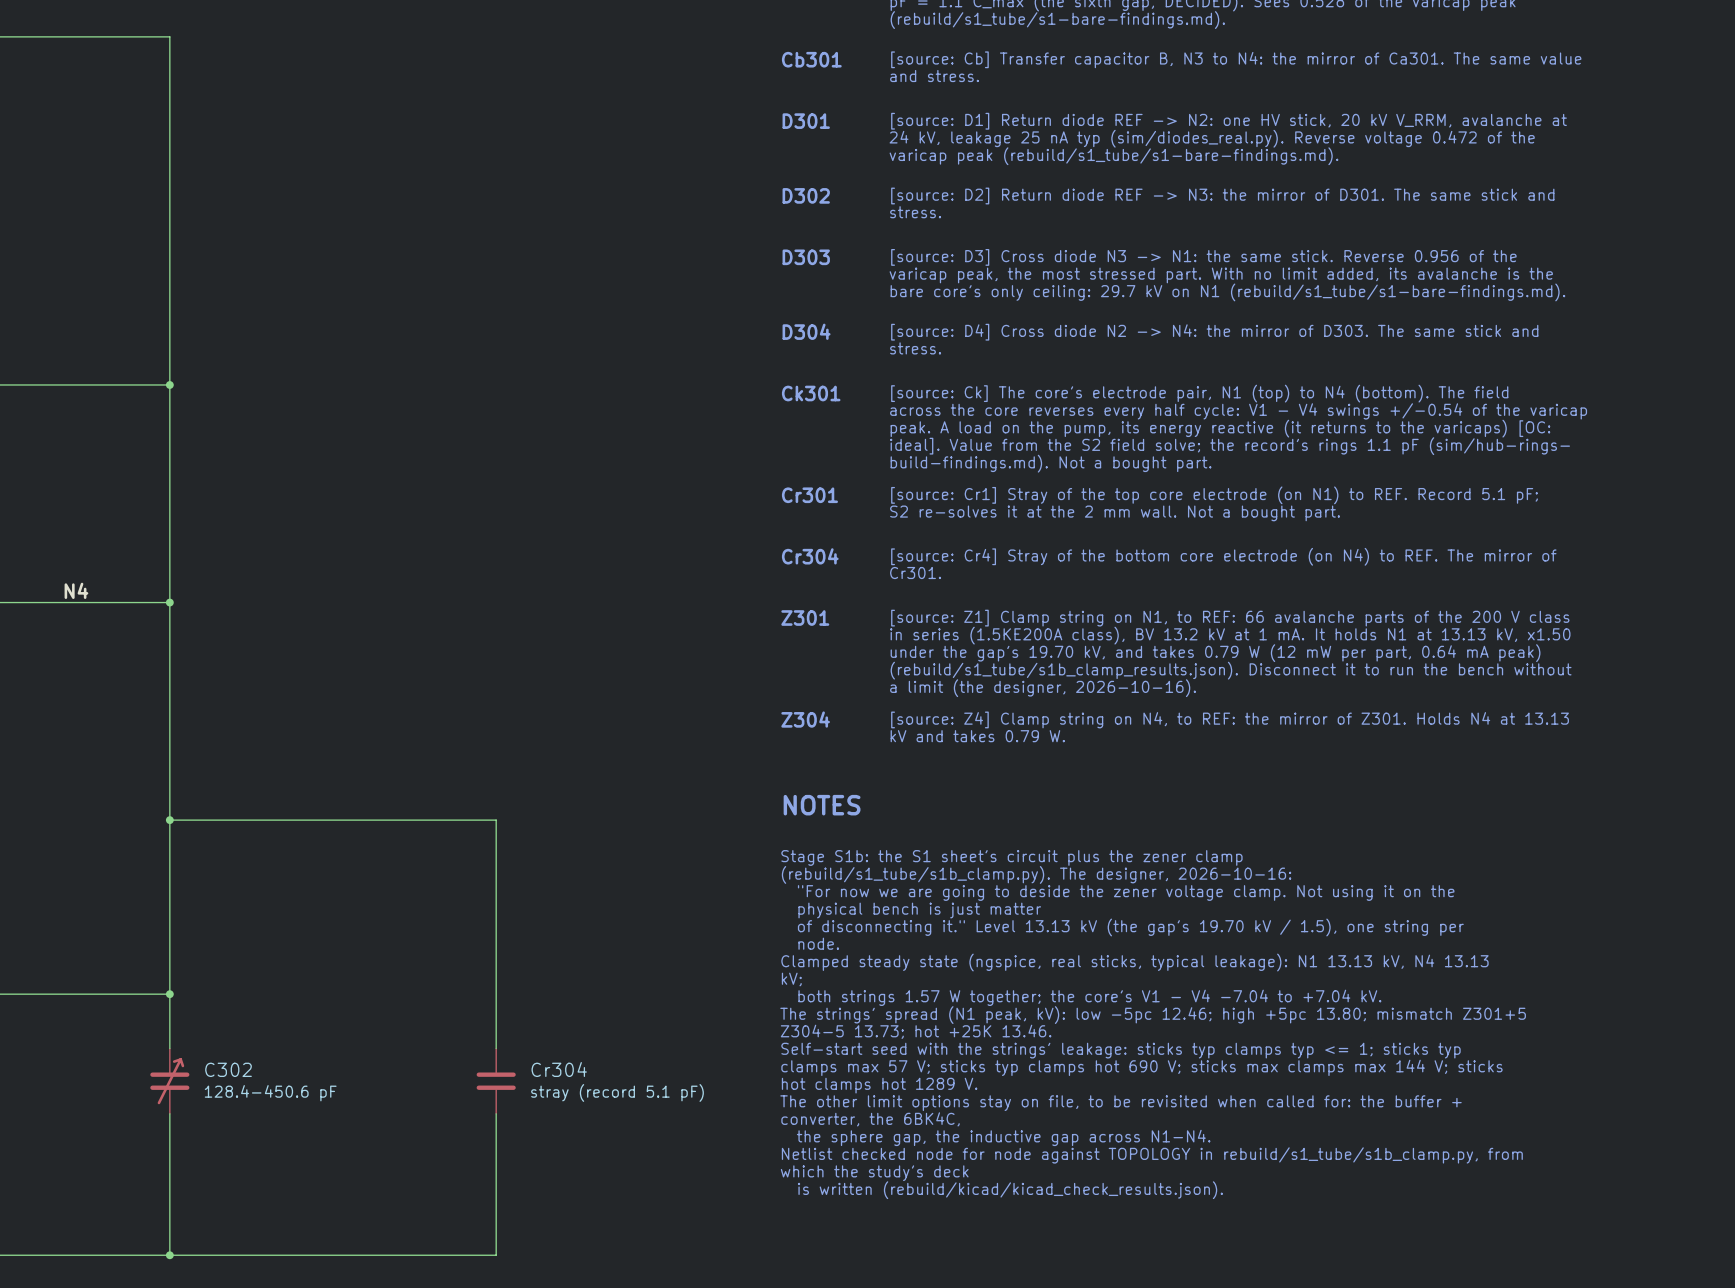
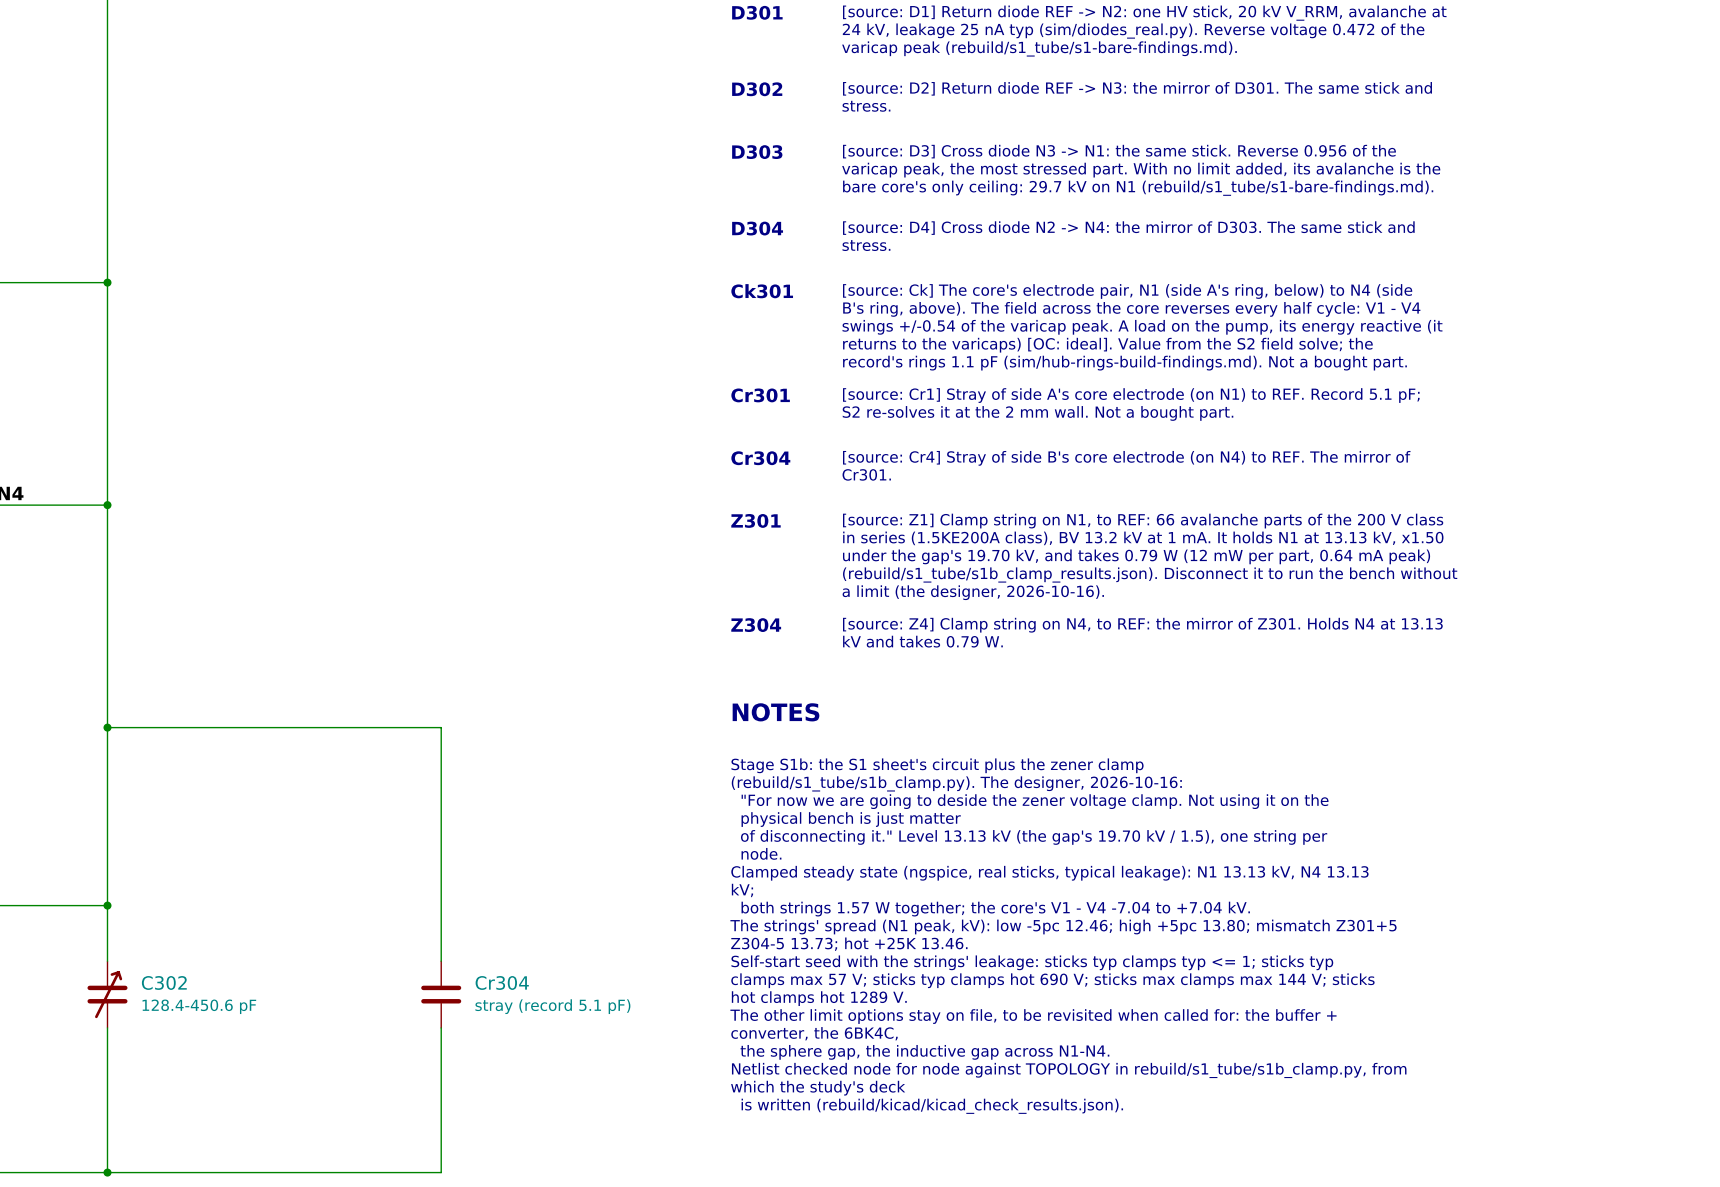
text: [source: Ck] The core's electrode pair, N1 (top) to N4 (bottom). The field (1199, 393) -> [source: Ck] The core's electrode pair, N1 (side A's ring, below) to N4 (side (1127, 291)
text: across the core reverses every half cycle: V1 - V4 swings +/-0.54 of the varicap (1238, 411) -> B's ring, above). The field across the core reverses every half cycle: V1 - V4 (1131, 309)
text: peak. A load on the pump, its energy reactive (it returns to the varicaps) [OC: (1220, 428) -> swings +/-0.54 of the varicap peak. A load on the pump, its energy reactive (it (1142, 327)
text: ideal]. Value from the S2 field solve; the record's rings 1.1 pF (sim/hub-rings- (1230, 446) -> returns to the varicaps) [OC: ideal]. Value from the S2 field solve; the (1107, 345)
text: build-findings.md). Not a bought part. (1051, 463) -> record's rings 1.1 pF (sim/hub-rings-build-findings.md). Not a bought part. (1124, 363)
text: [source: Cr1] Stray of the top core electrode (on N1) to REF. Record 5.1 pF; (1214, 495) -> [source: Cr1] Stray of side A's core electrode (on N1) to REF. Record 5.1 pF; (1131, 395)
text: [source: Cr4] Stray of the bottom core electrode (on N4) to REF. The mirror of (1223, 556) -> [source: Cr4] Stray of side B's core electrode (on N4) to REF. The mirror of (1126, 458)

